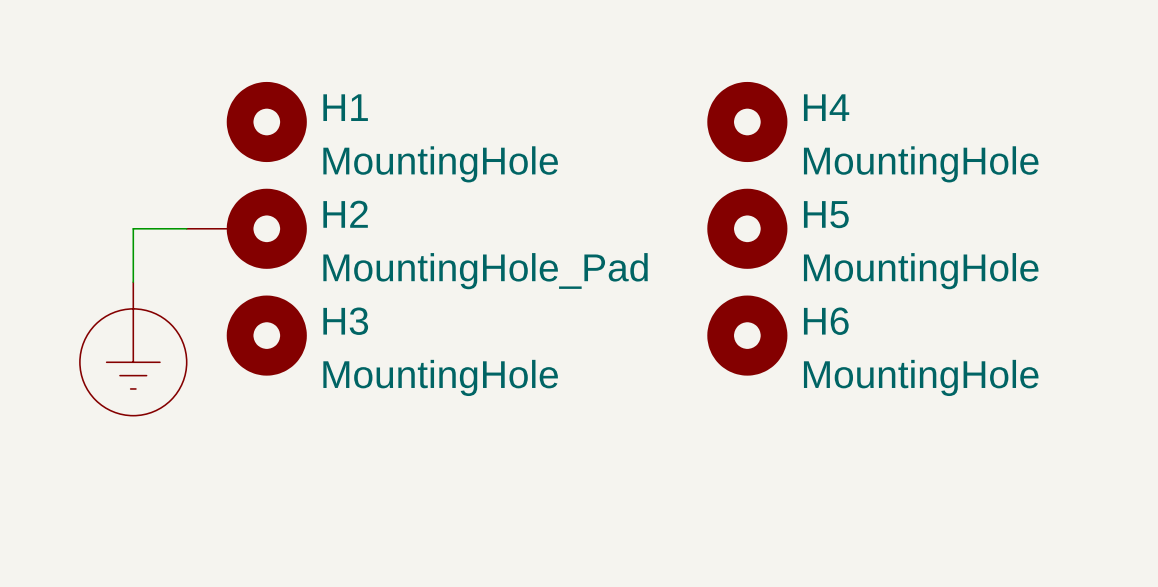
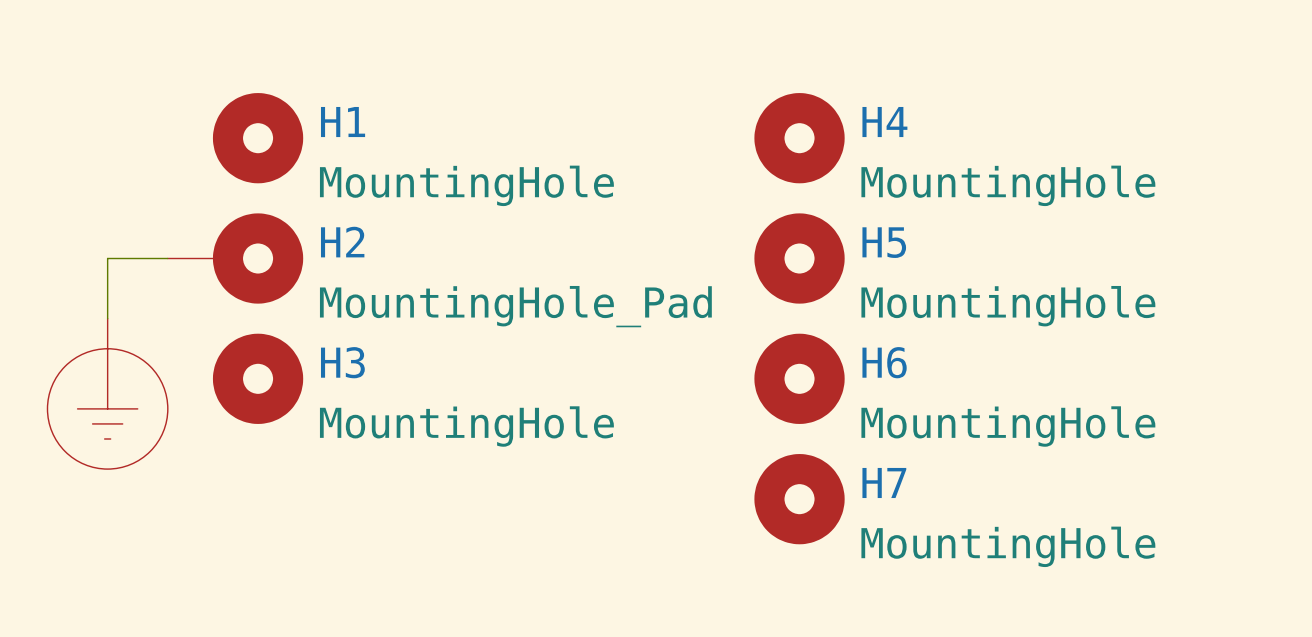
H7: none -> MountingHole (799, 499)

